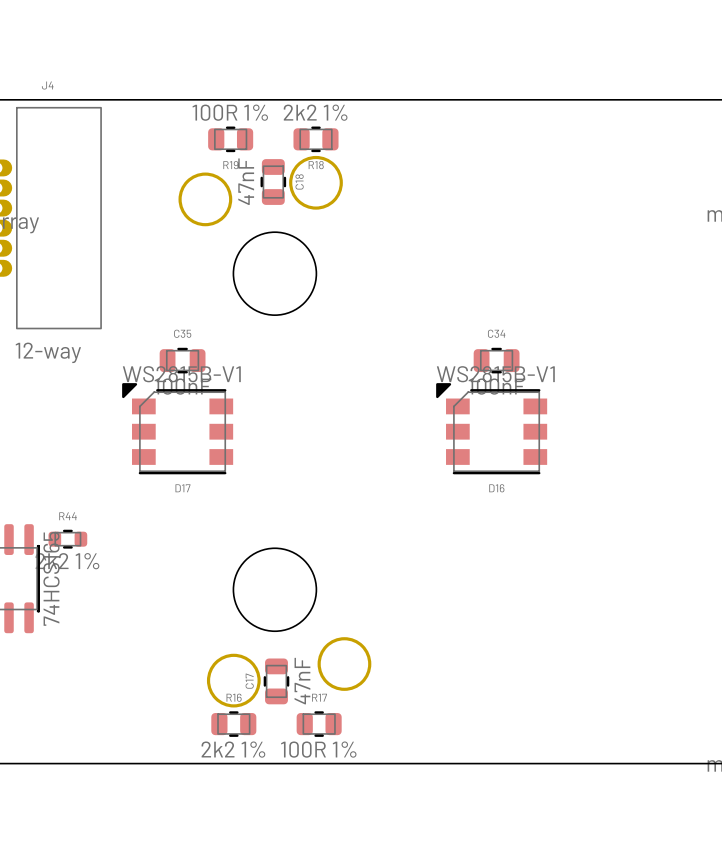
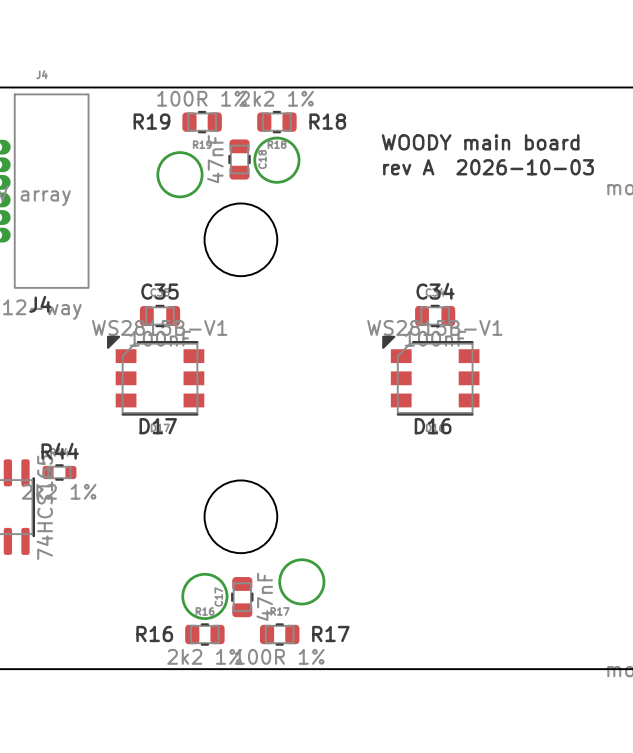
text: none -> R19 (151, 121)
text: none -> R18 (327, 121)
text: none -> WOODY main board (480, 142)
text: none -> rev A 2026-10-03 (488, 167)
text: none -> C35 (159, 291)
text: none -> C34 (435, 291)
text: none -> J4 (40, 304)
text: none -> D17 (158, 426)
text: none -> D16 (433, 426)
text: none -> R44 (60, 451)
text: none -> R16 (154, 634)
text: none -> R17 (330, 634)

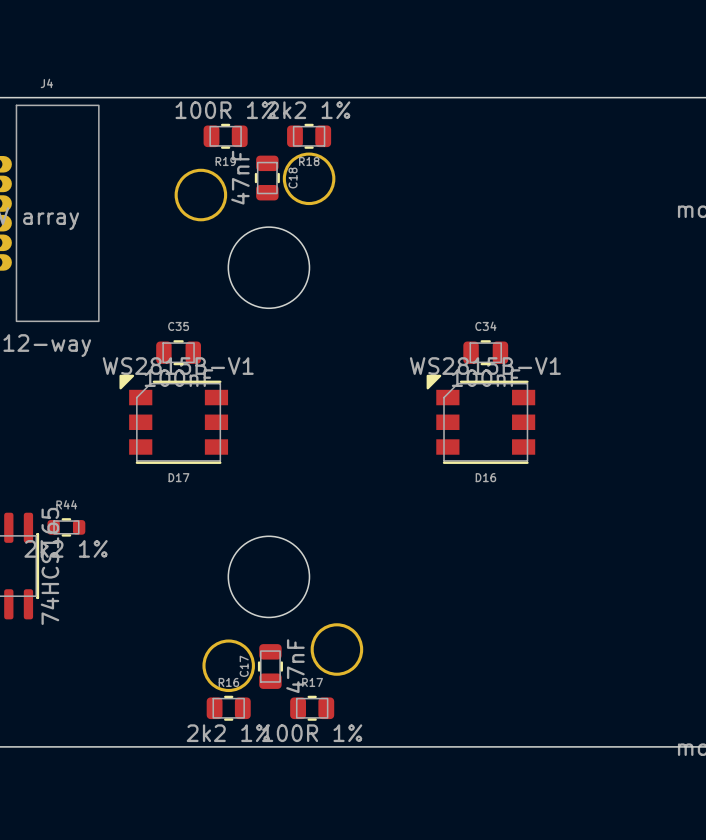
text: R19 (151, 121) -> none
text: R18 (327, 121) -> none
text: WOODY main board (480, 142) -> none
text: rev A 2026-10-03 (488, 167) -> none
text: C35 (159, 291) -> none
text: C34 (435, 291) -> none
text: J4 (40, 304) -> none
text: D17 (158, 426) -> none
text: D16 (433, 426) -> none
text: R44 (60, 451) -> none
text: R16 (154, 634) -> none
text: R17 (330, 634) -> none

